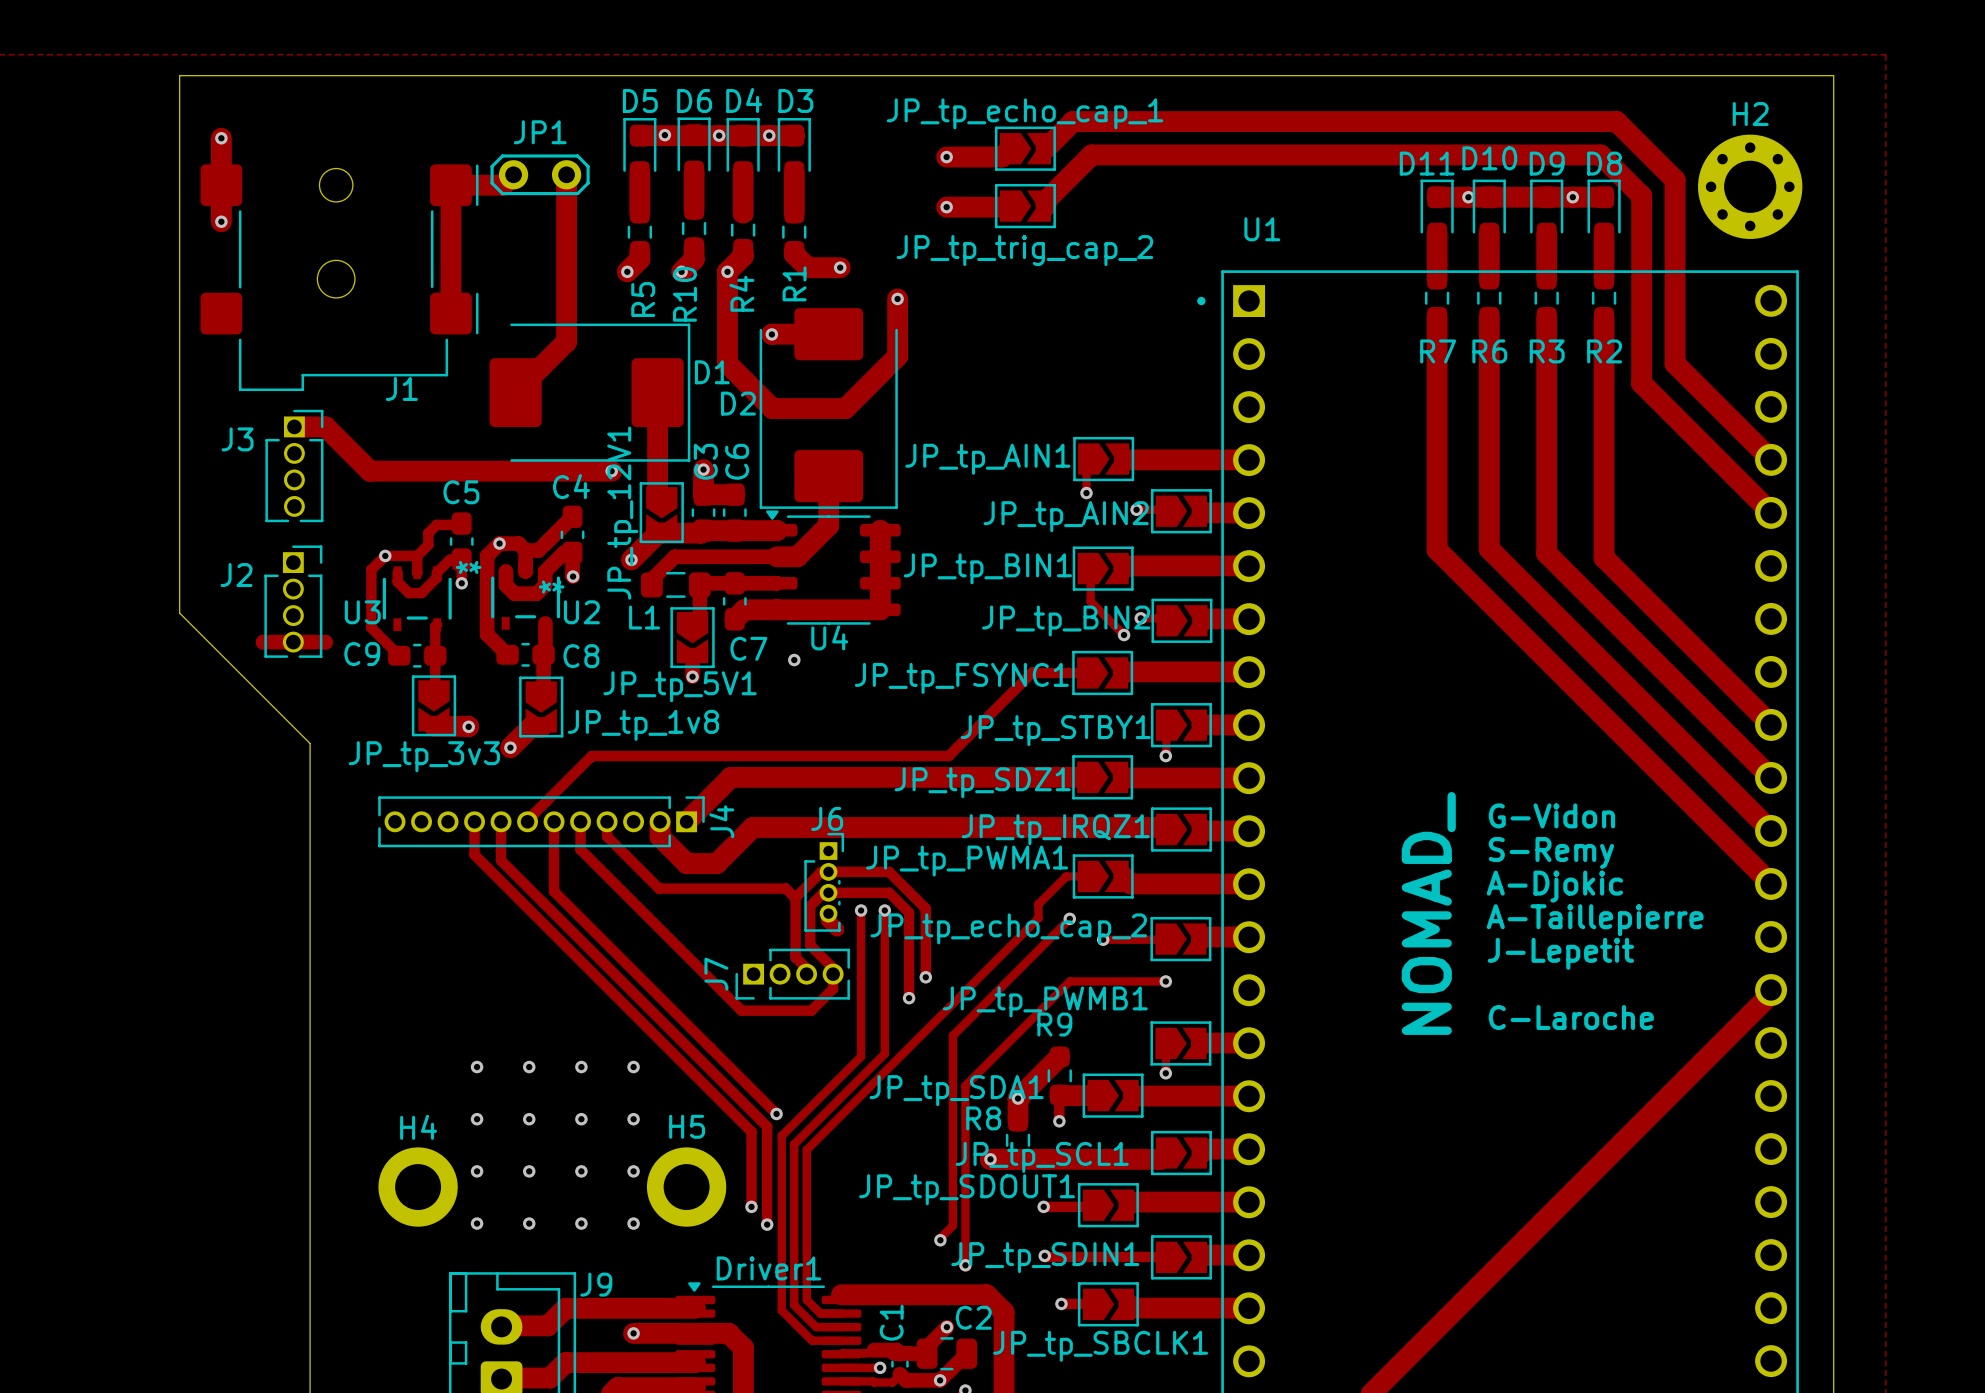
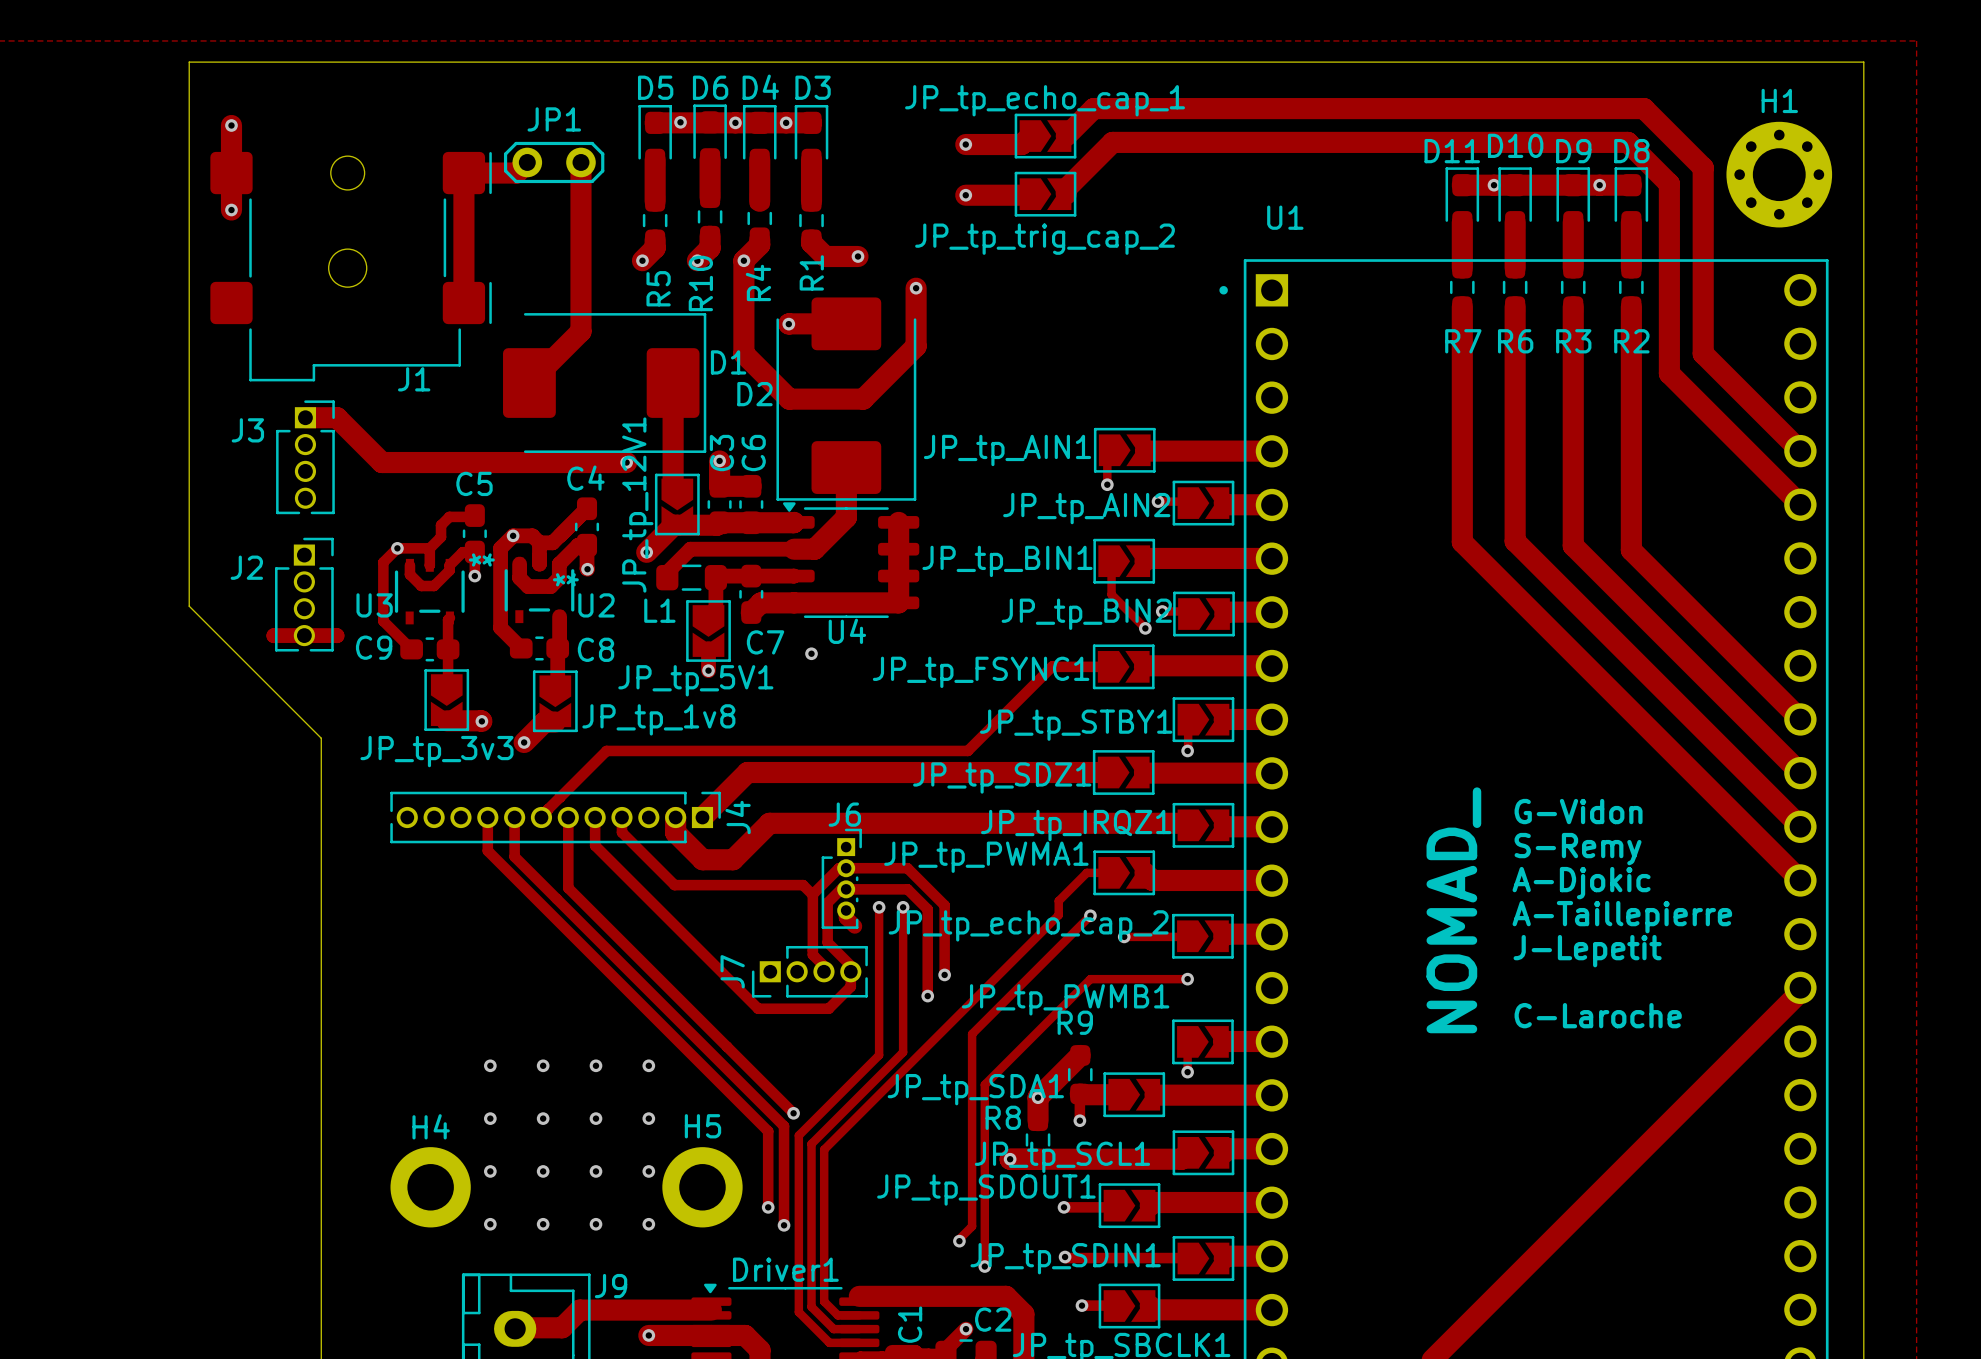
H2 name: H2 (1750, 114) -> H1 (1779, 100)

